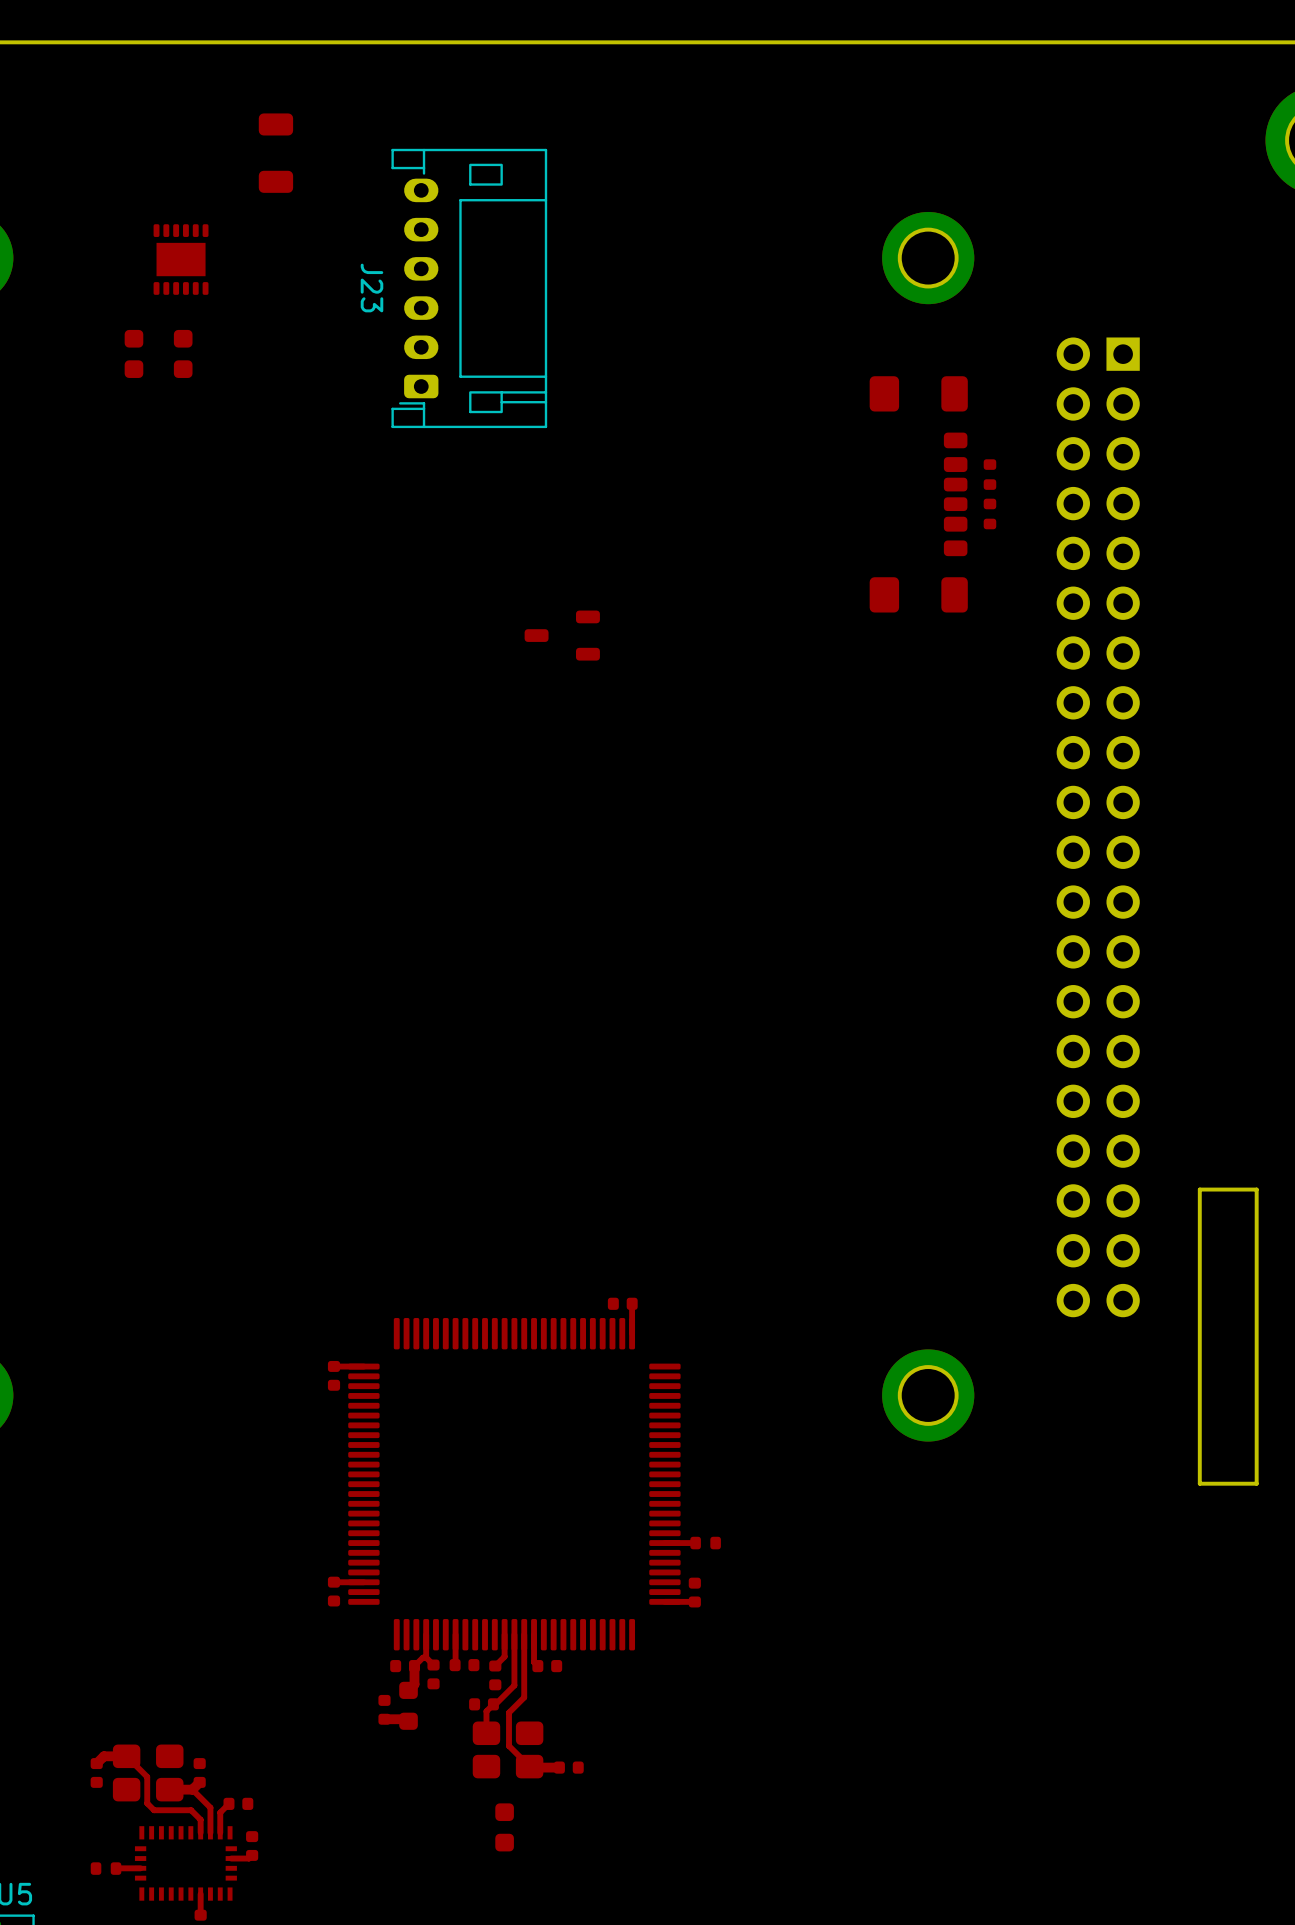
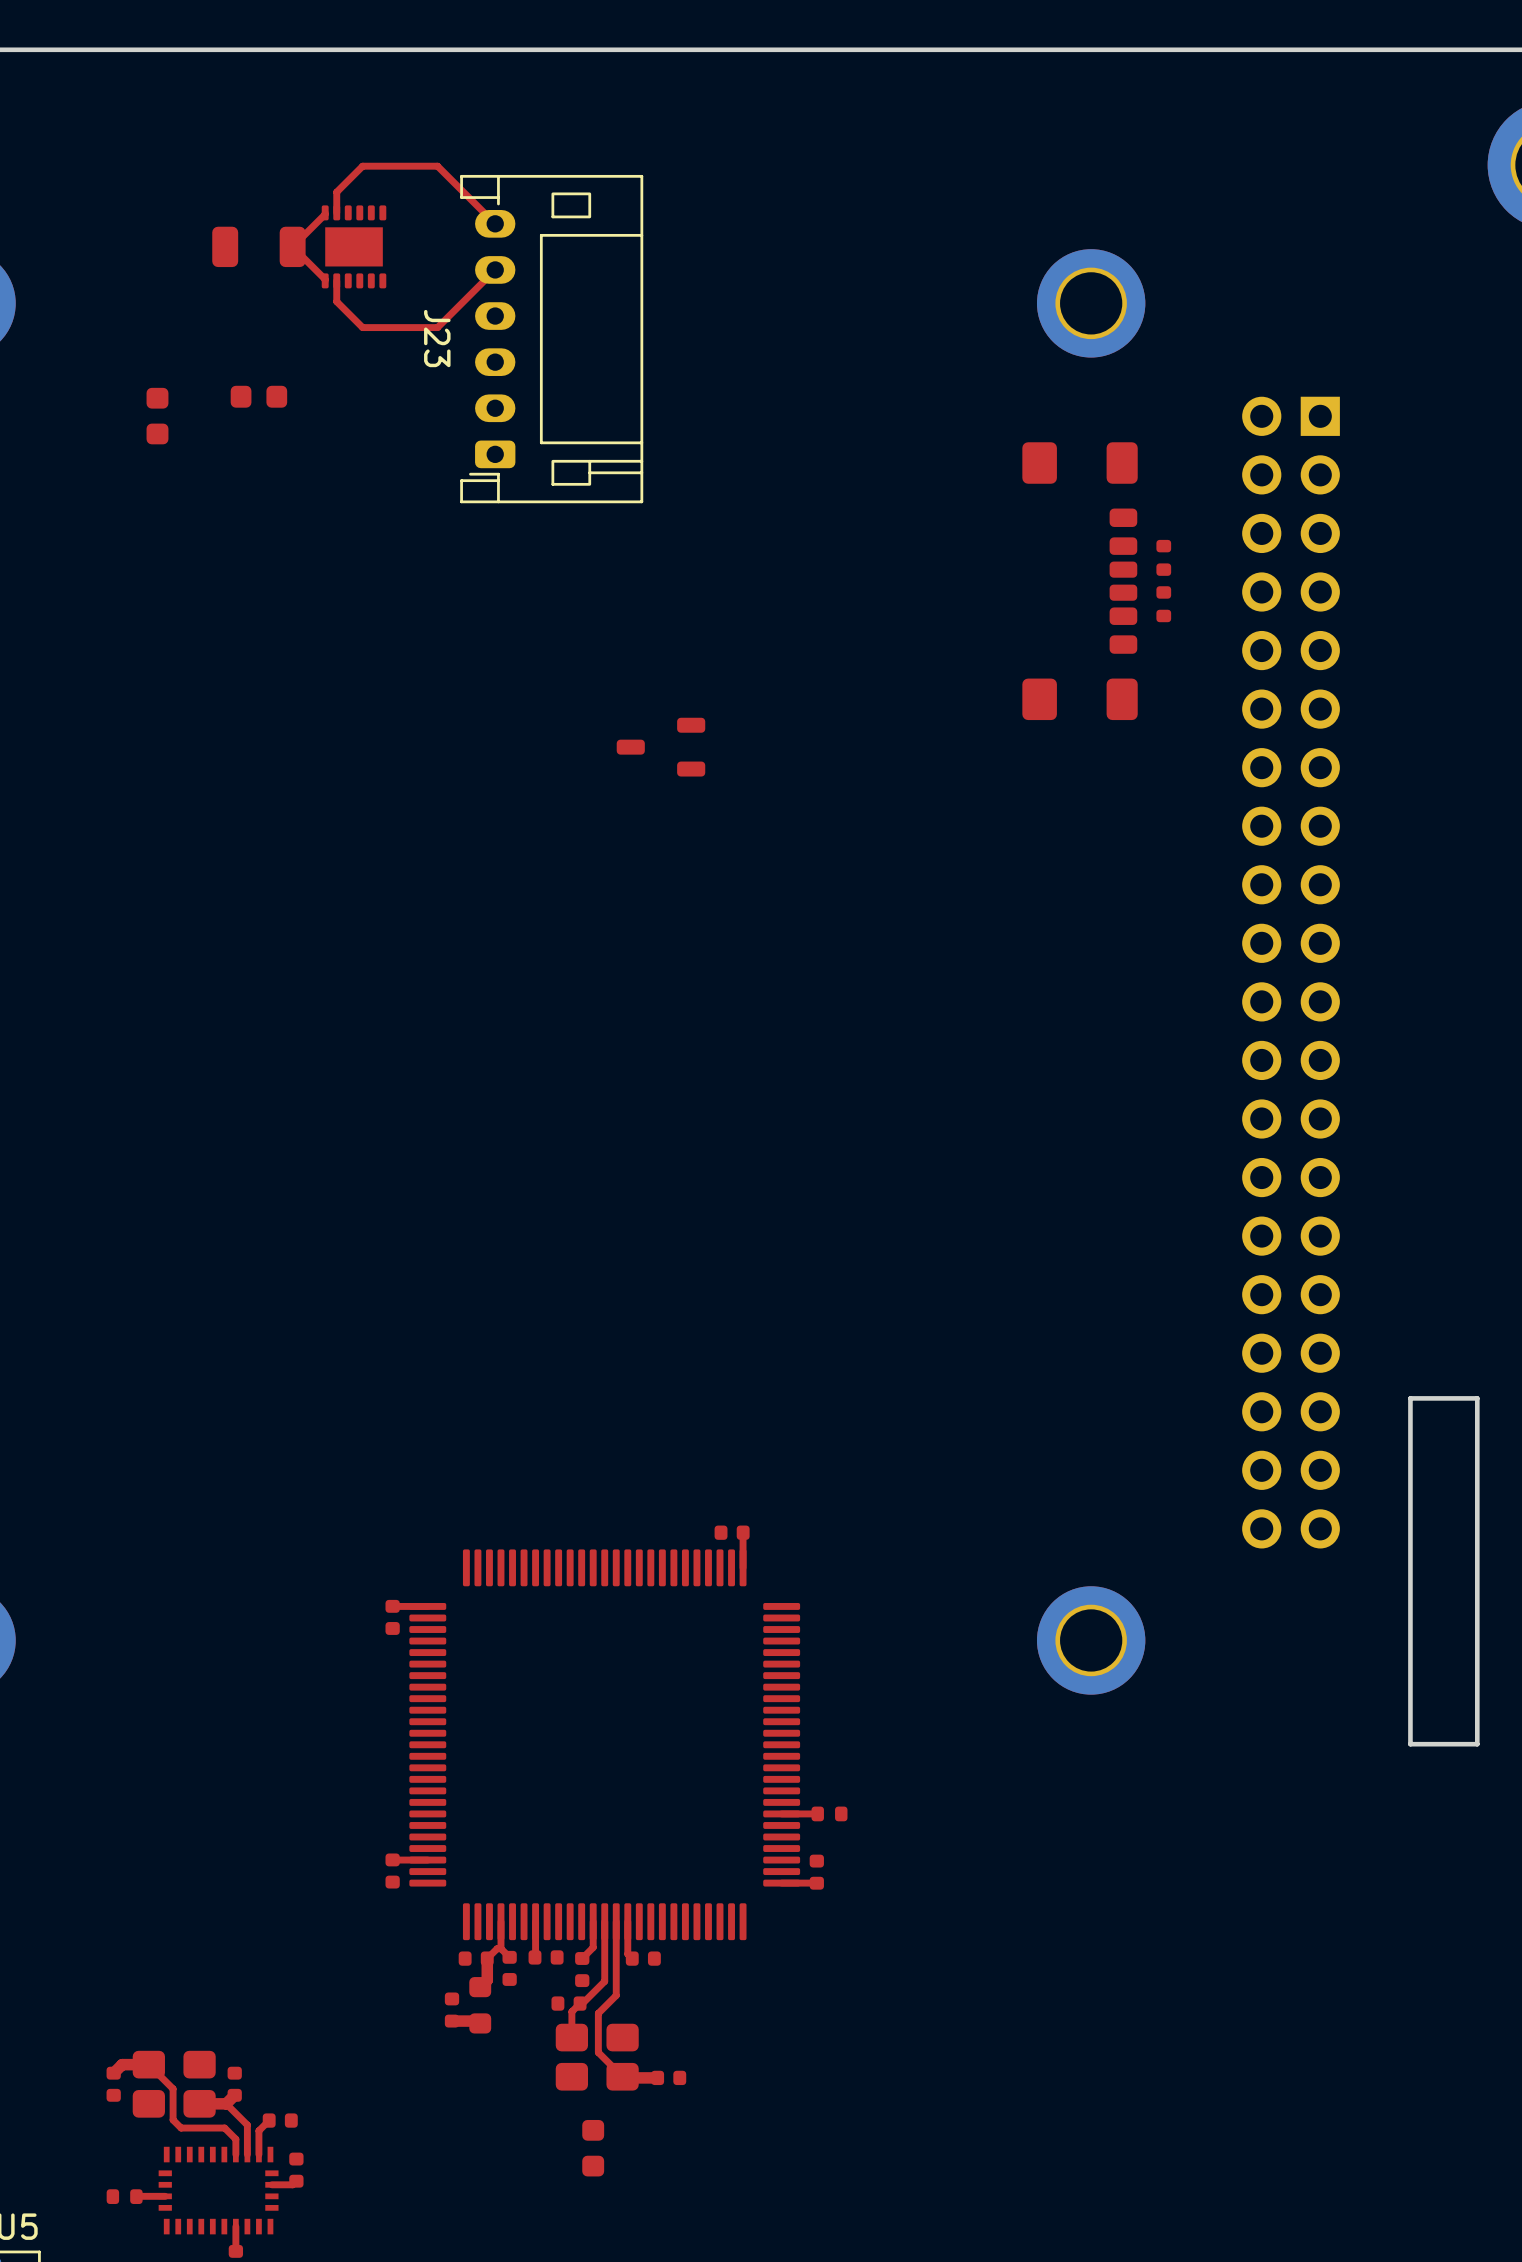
part rotation: 0° (275, 153) -> 90° clockwise (258, 246)
part position: (275, 153) -> (258, 246)
top track: none -> (325, 212) (292, 246) (325, 280)
top track: none -> (336, 212) (336, 192) (362, 166) (437, 166) (495, 223)
top track: none -> (495, 269) (437, 327) (362, 327) (336, 301) (336, 280)
part position: (181, 259) -> (354, 246)
part rotation: 0° (183, 353) -> 90° clockwise (258, 396)
part position: (183, 353) -> (258, 396)

